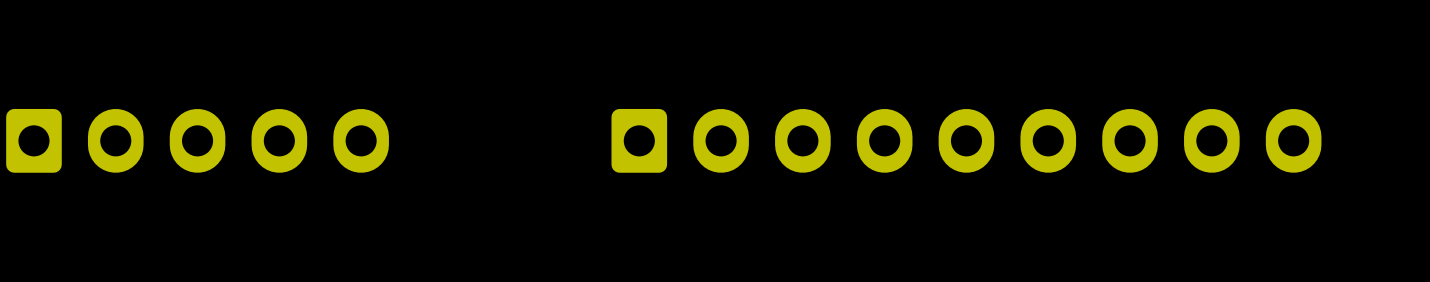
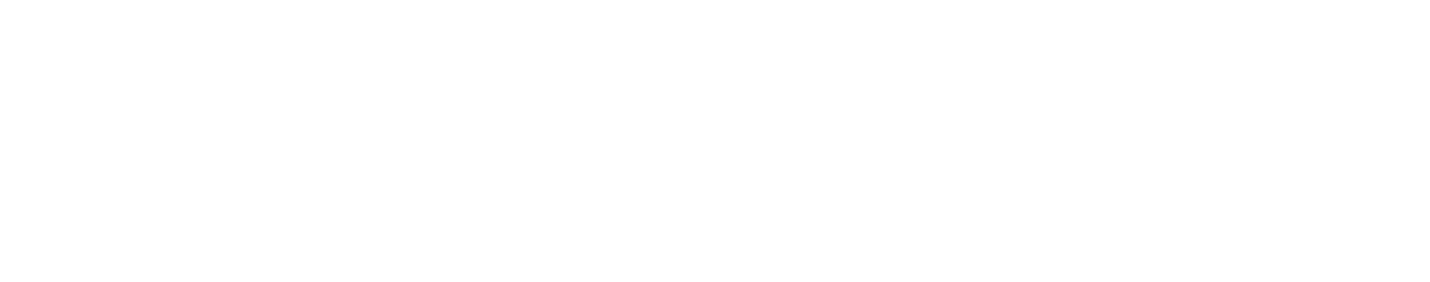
part: (197, 140) -> none
part: (966, 140) -> none

